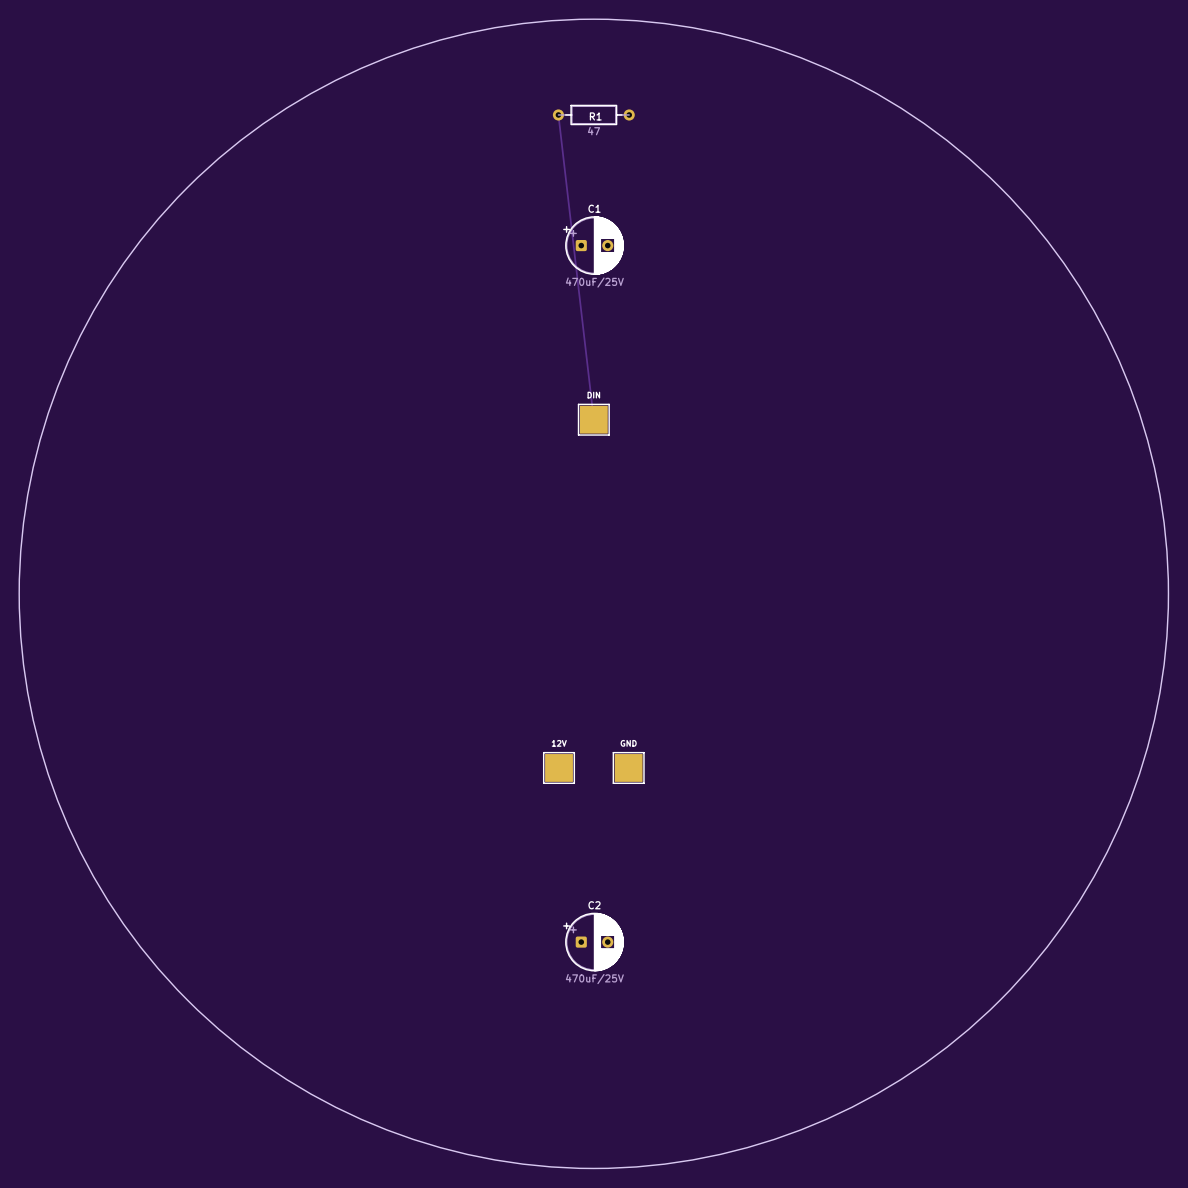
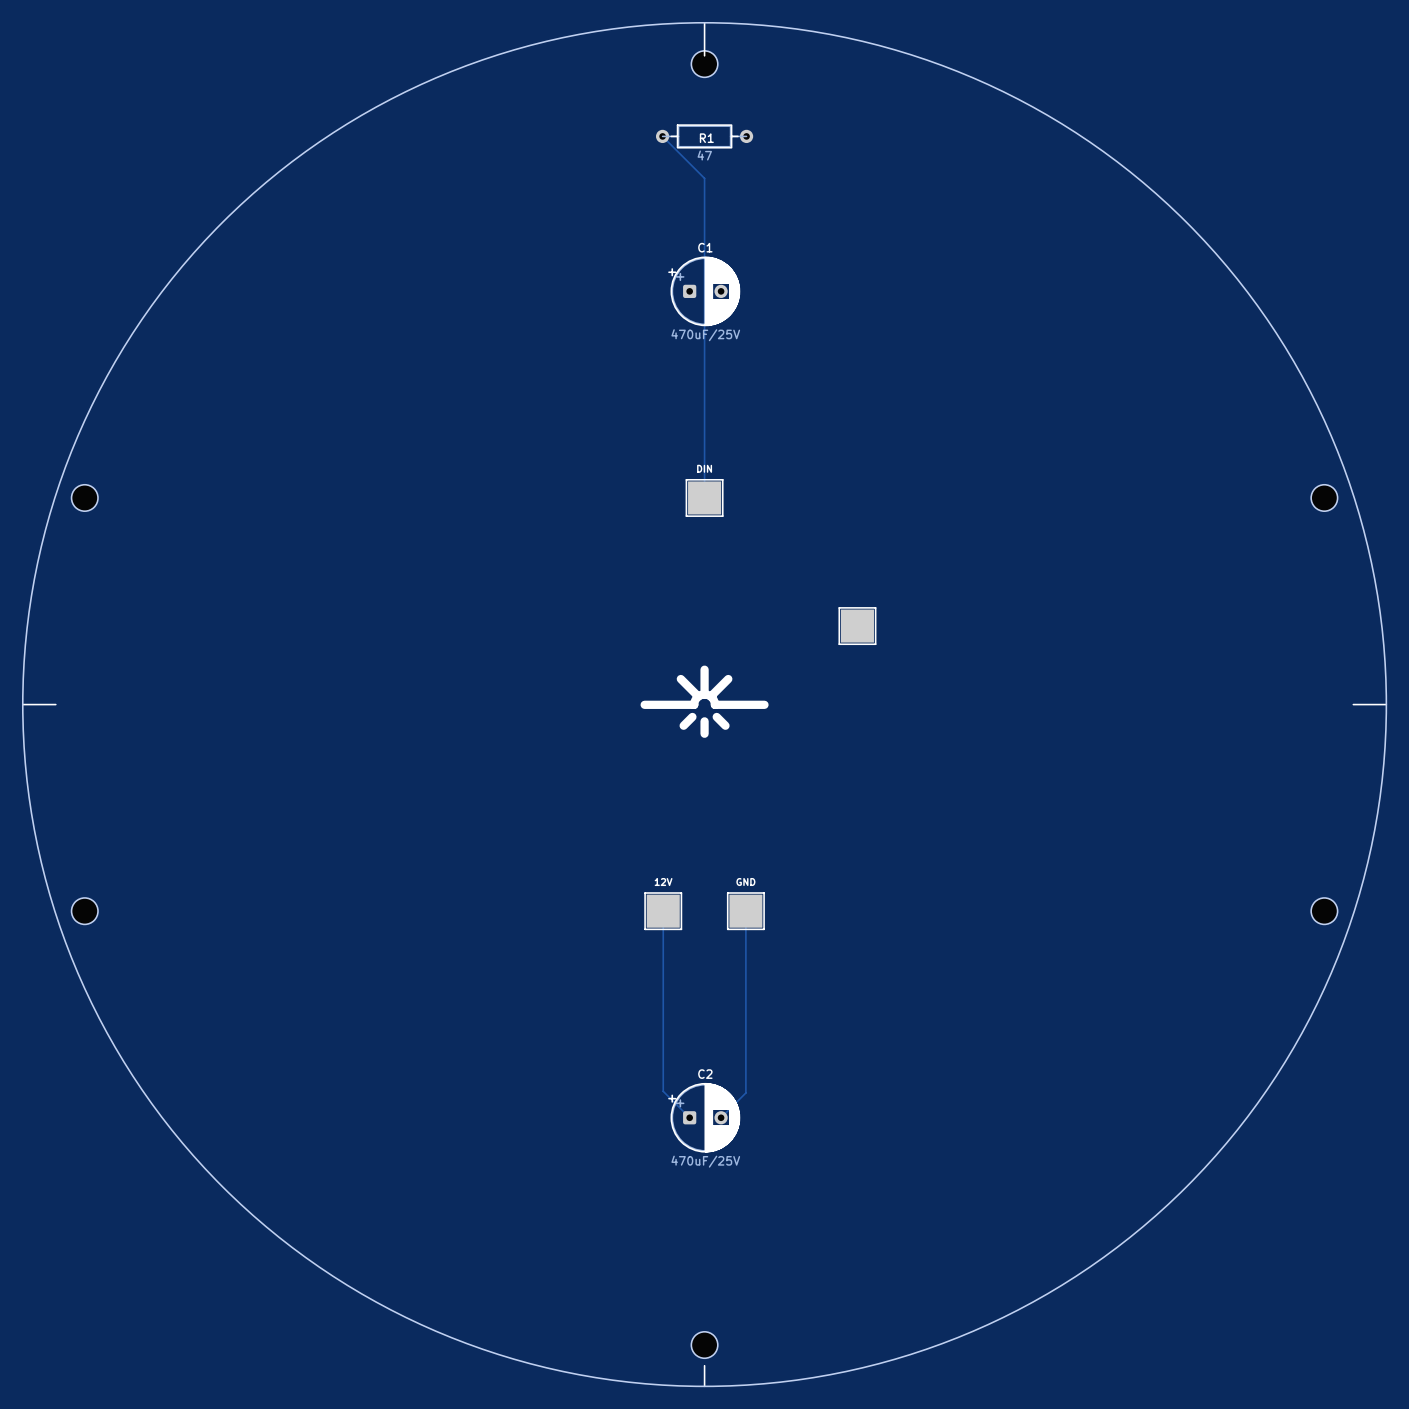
line: none -> (704, 22) (704, 55)
part: none -> (704, 64)
track: (558, 114) (593, 419) -> (662, 136) (704, 178) (704, 497)
part: none -> (84, 497)
part: none -> (1324, 497)
part: none -> (857, 626)
line: none -> (704, 669) (704, 694)
line: none -> (680, 679) (698, 696)
line: none -> (728, 679) (710, 696)
line: none -> (55, 704) (22, 704)
line: none -> (1386, 704) (1353, 704)
line: none -> (764, 704) (714, 704) (711, 697) (704, 694) (697, 697) (694, 704) (644, 704)
line: none -> (692, 716) (683, 725)
line: none -> (716, 716) (725, 725)
line: none -> (704, 721) (704, 733)
part: none -> (84, 911)
track: none -> (663, 911) (663, 1091) (689, 1117)
track: none -> (745, 911) (745, 1092) (721, 1117)
part: none -> (1324, 911)
part: none -> (704, 1345)
line: none -> (704, 1365) (704, 1386)

